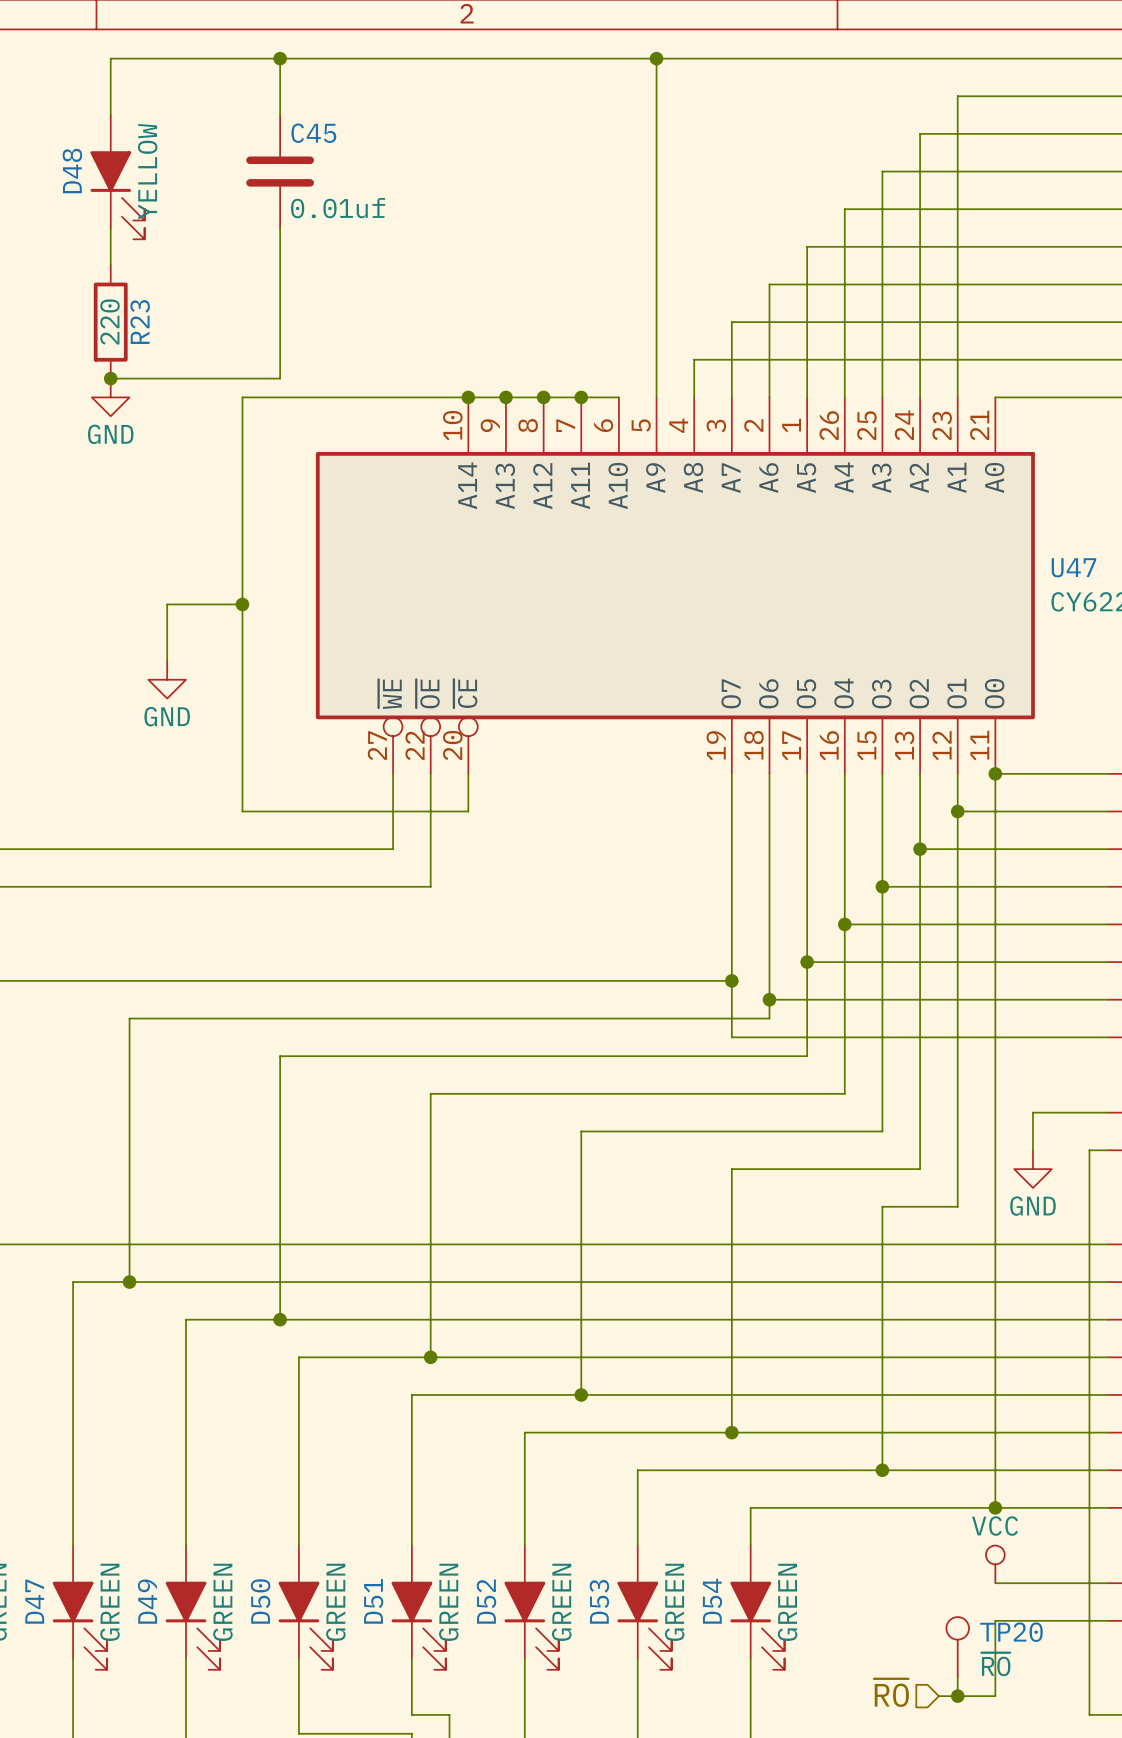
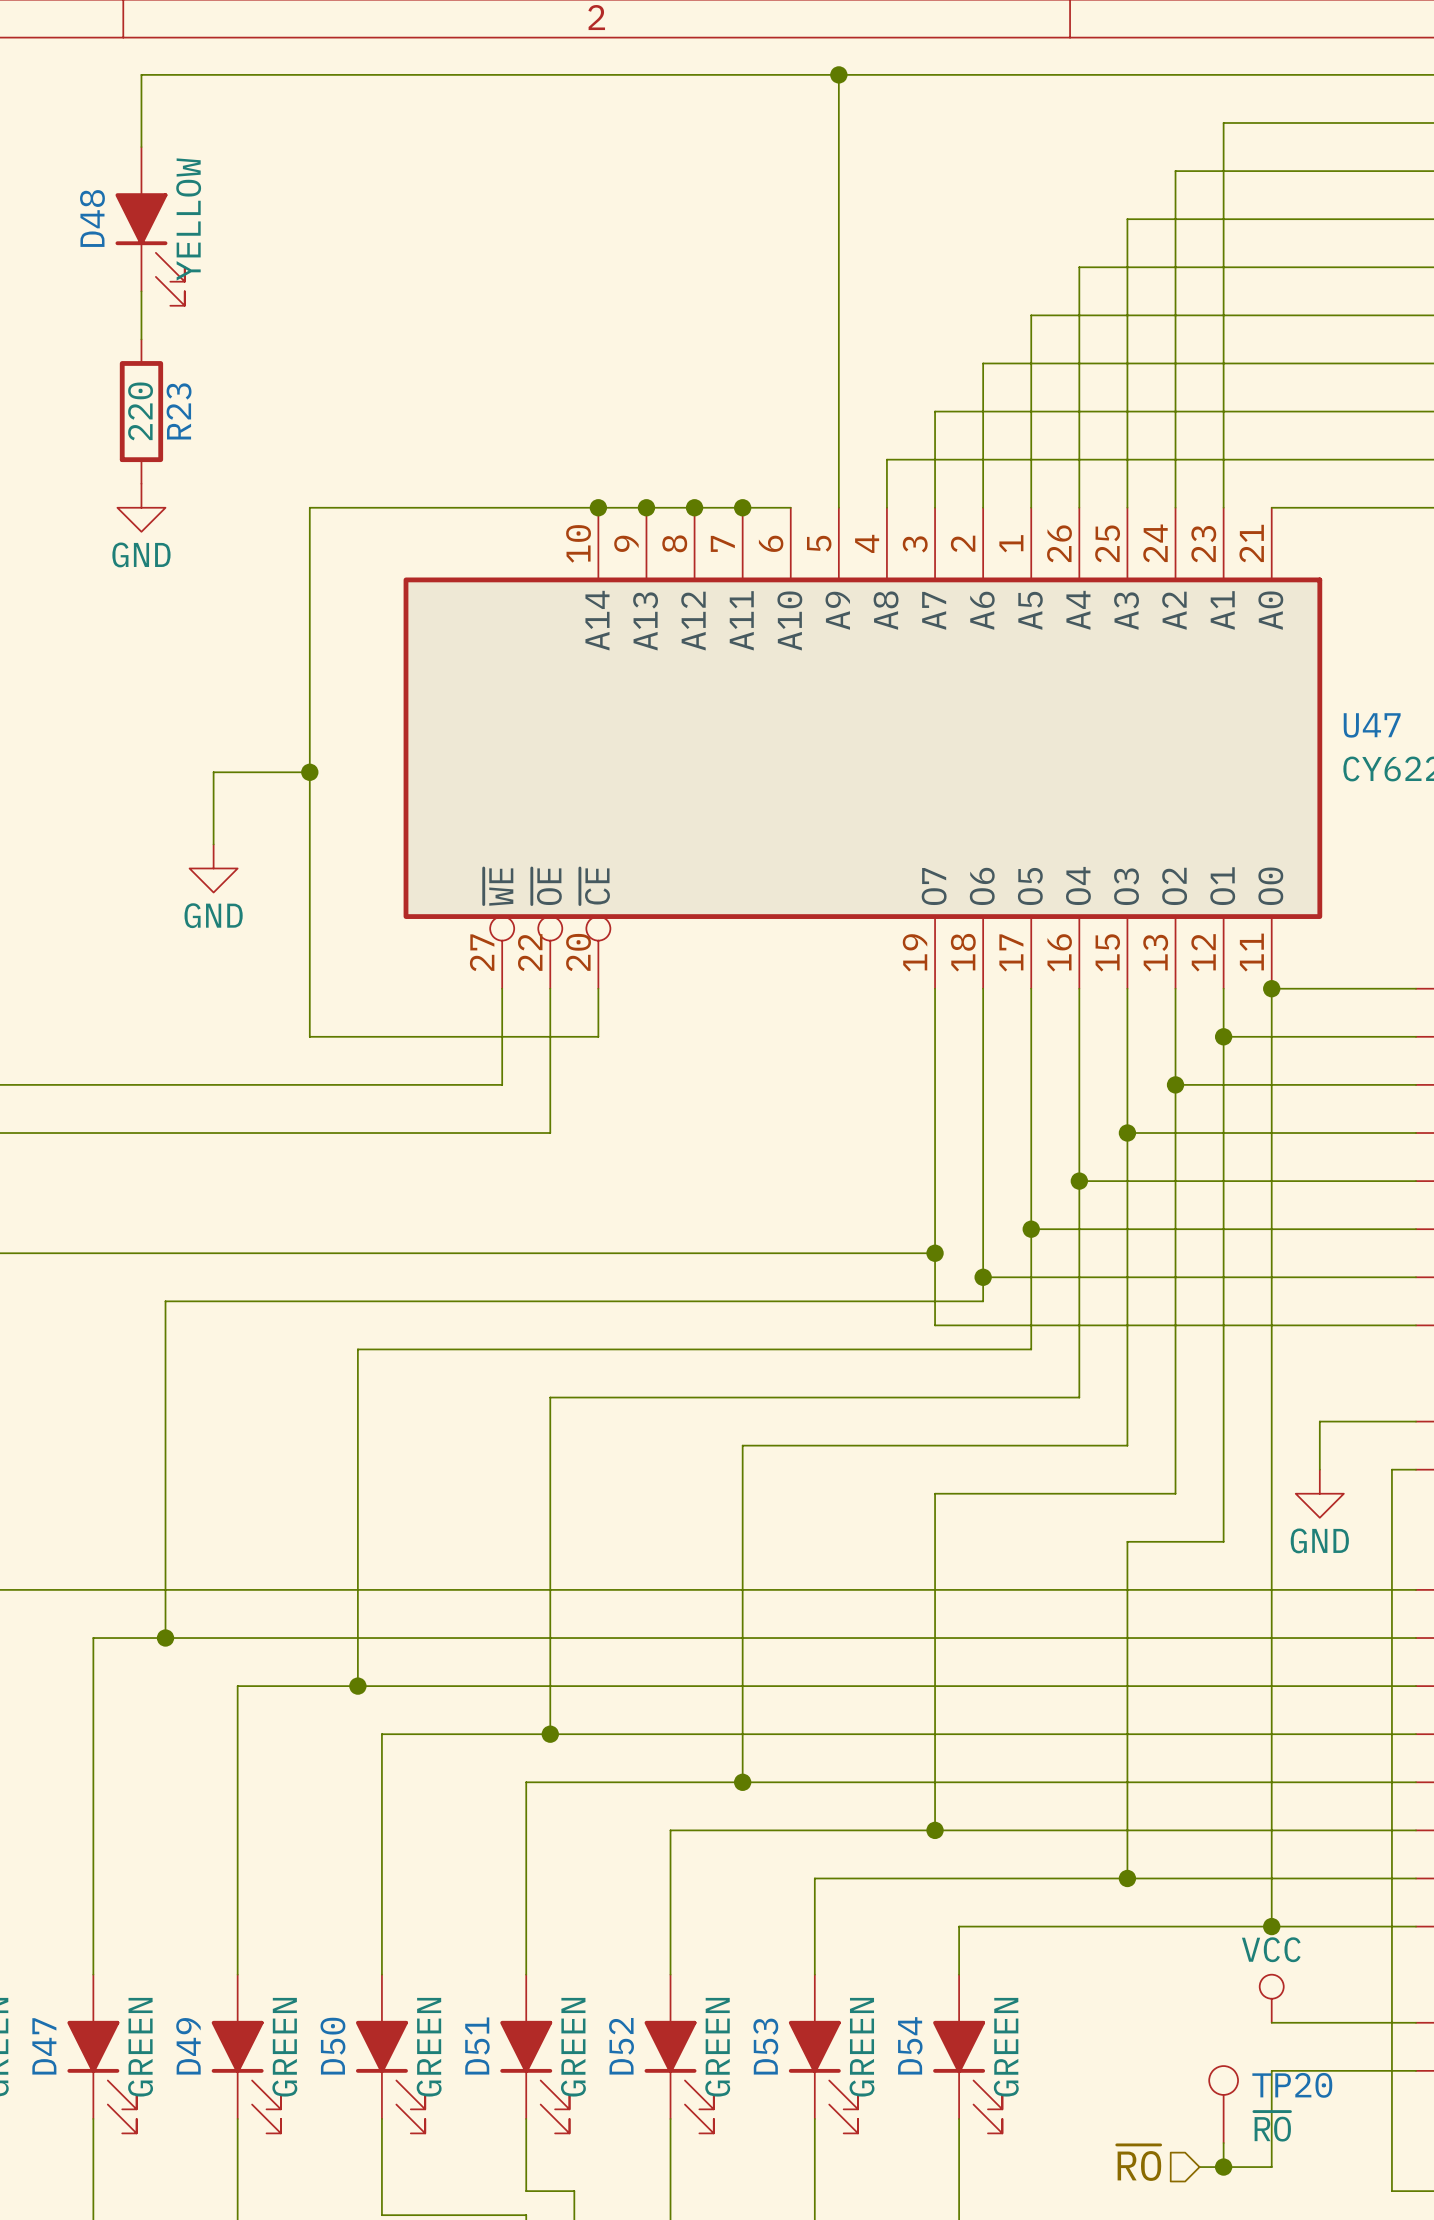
wire: (280, 58) (280, 115) -> none
junction: (280, 58) -> none
C45: 0.01uf (280, 171) -> none
wire: (280, 228) (280, 378) (110, 378) -> none
junction: (110, 378) -> none

